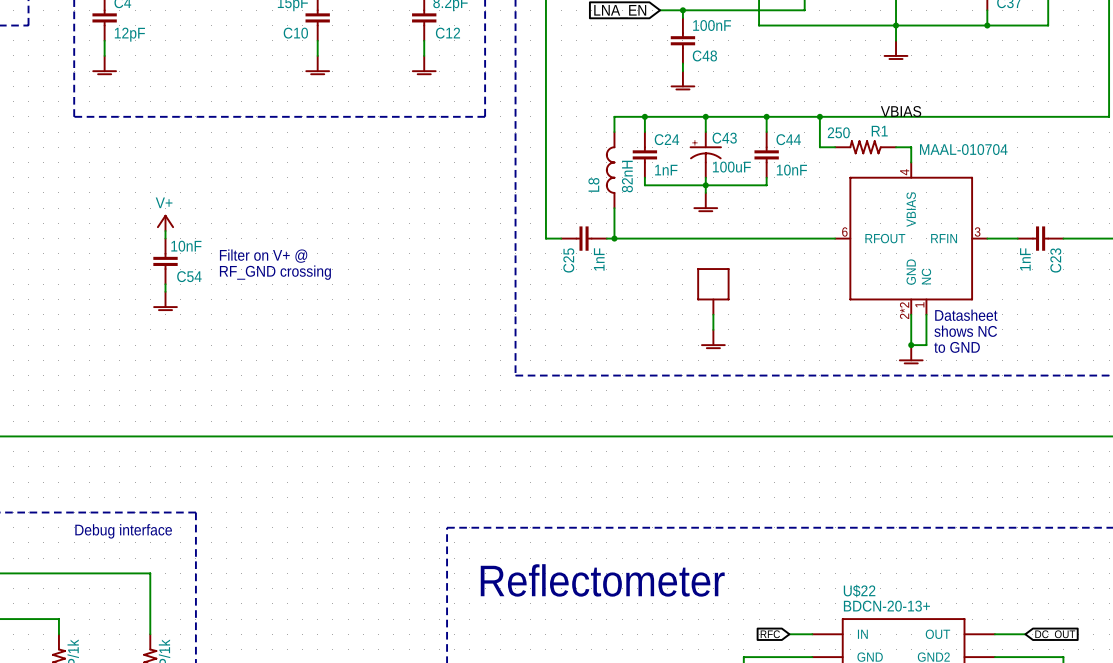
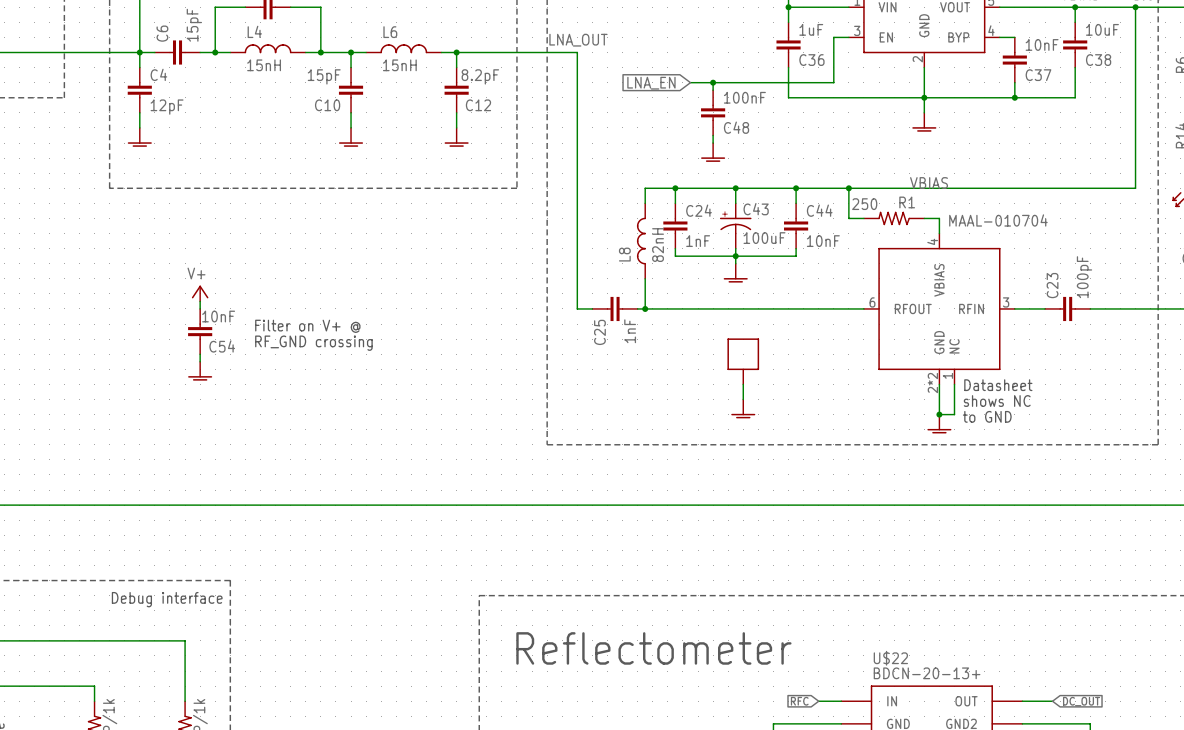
C23 value: 1nF (1025, 259) -> 100pF (1084, 277)
C23 name position: C23 (1055, 260) -> C23 (1052, 285)

